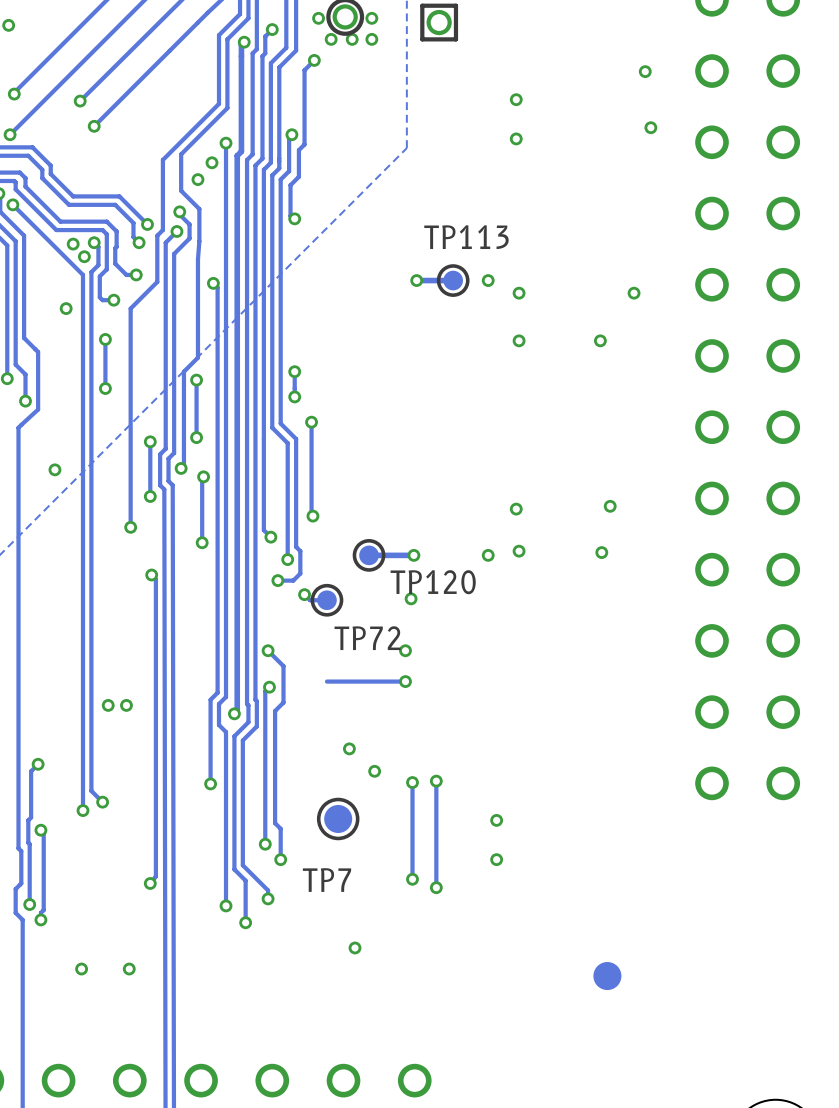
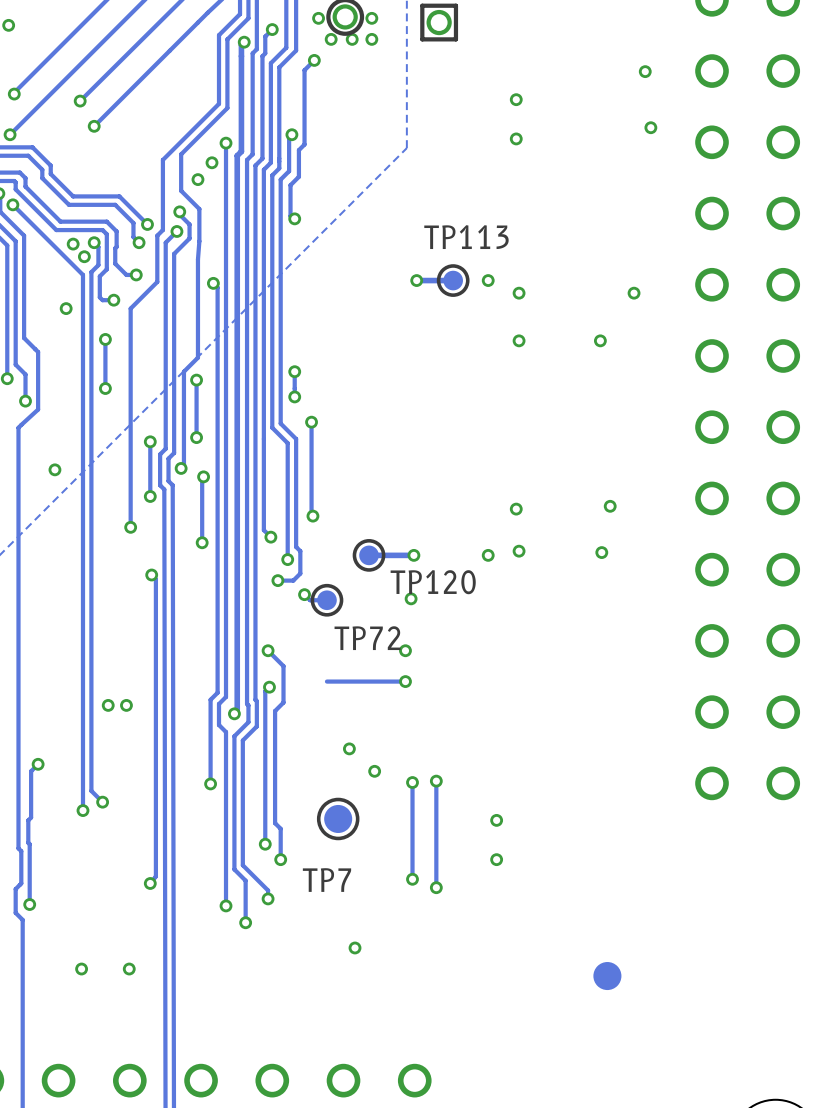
track: (40, 830) (43, 833) (43, 910) (40, 912) (40, 919) -> none
via: (40, 830) -> none
via: (40, 919) -> none

